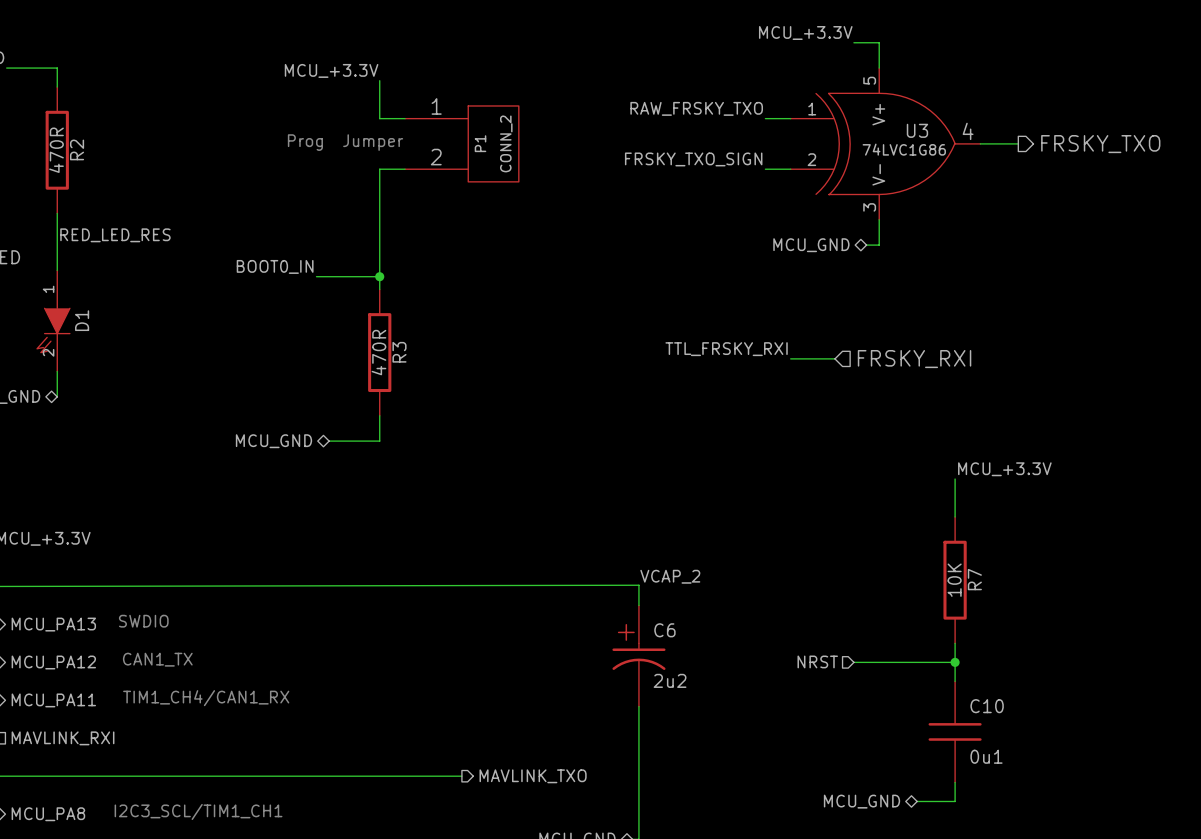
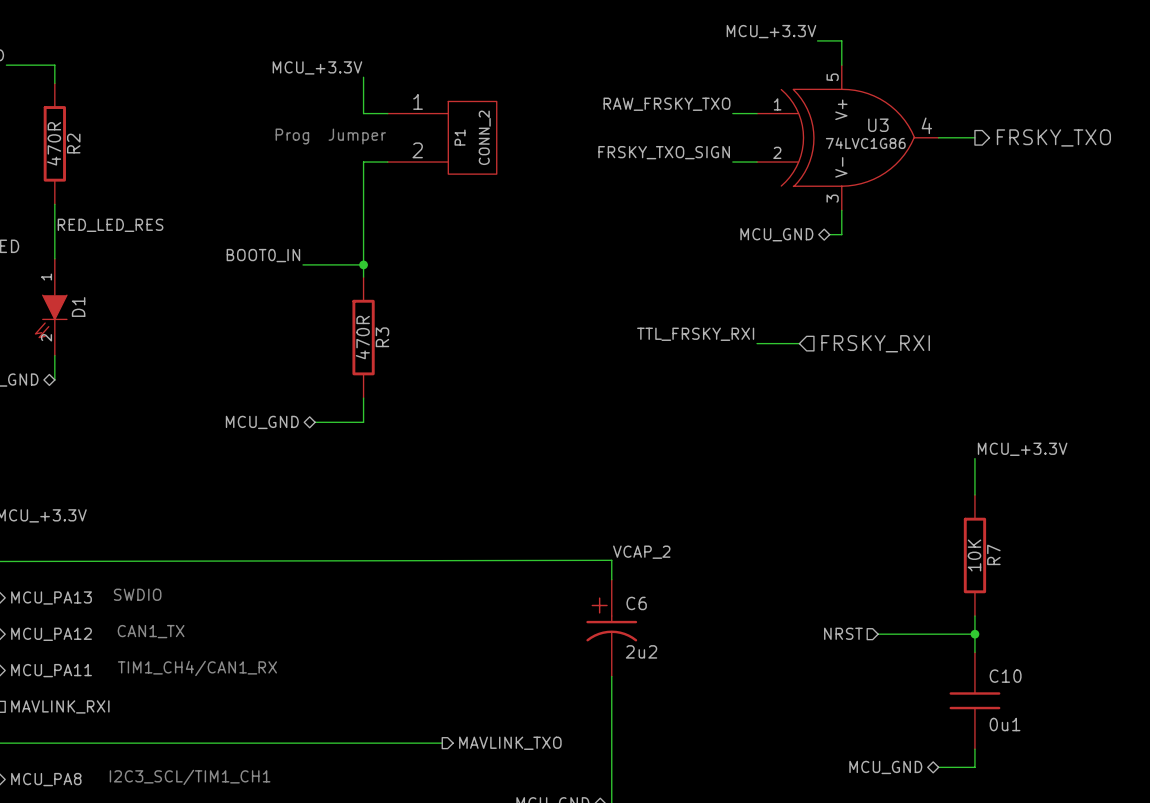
label position: MCU_+3.3V (1004, 469) -> MCU_+3.3V (1022, 449)
wire: (955, 479) (955, 516) -> (974, 458) (974, 494)
R7 position: (955, 580) -> (974, 555)
wire: (955, 643) (955, 681) -> (974, 616) (974, 652)
hierarchical label position: NRST (817, 661) -> NRST (843, 633)
wire: (853, 662) (917, 662) -> (914, 634) (974, 634)
junction: (955, 662) -> none
junction: none -> (974, 634)
C10 position: (955, 731) -> (974, 700)
wire: (955, 782) (955, 801) (917, 801) -> (974, 749) (974, 767) (938, 767)
hierarchical label position: MCU_GND (861, 801) -> MCU_GND (885, 767)

